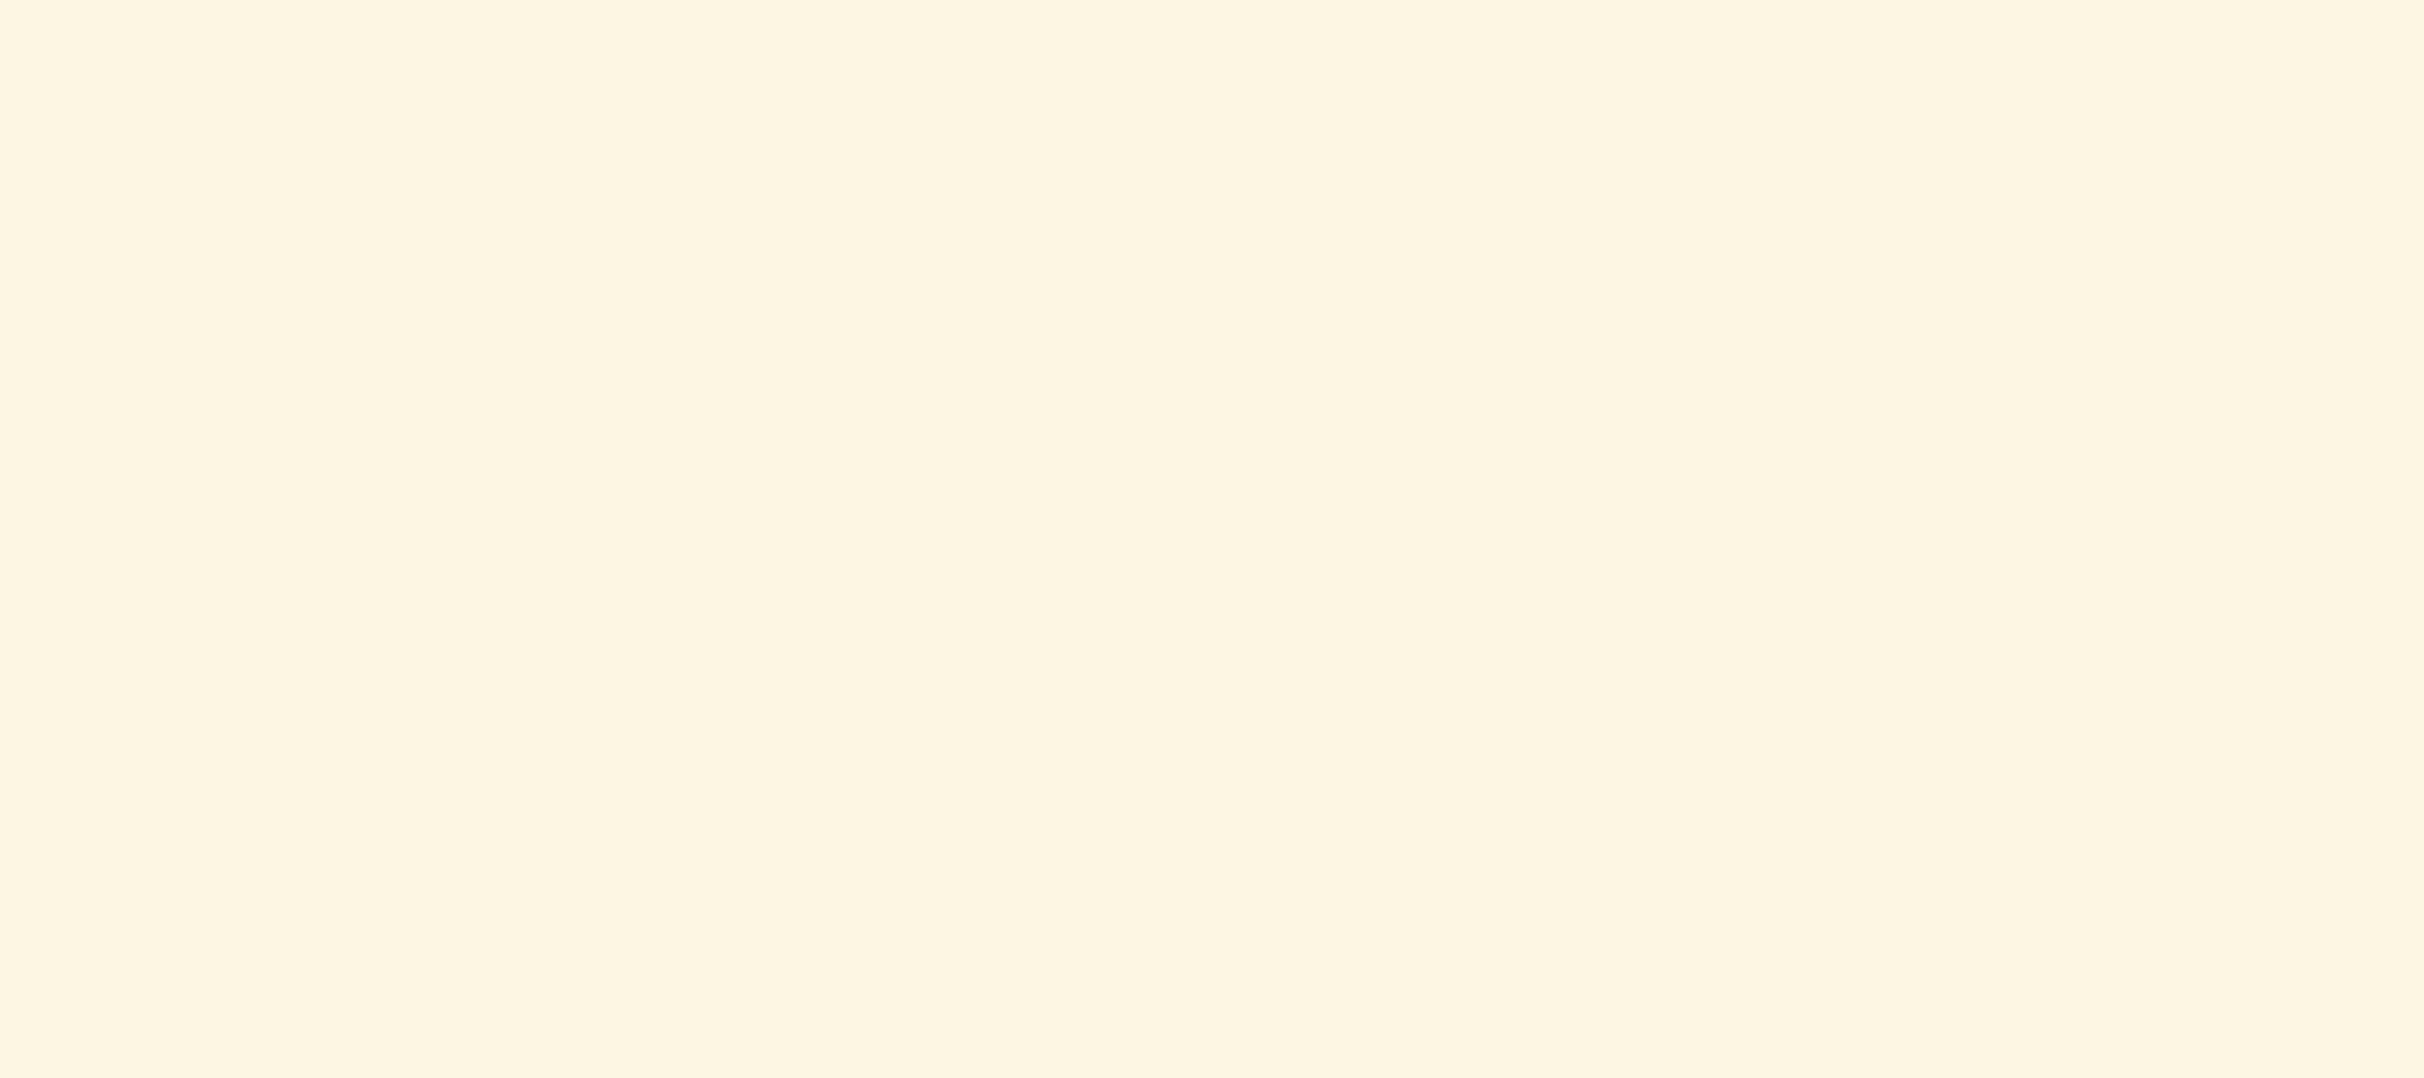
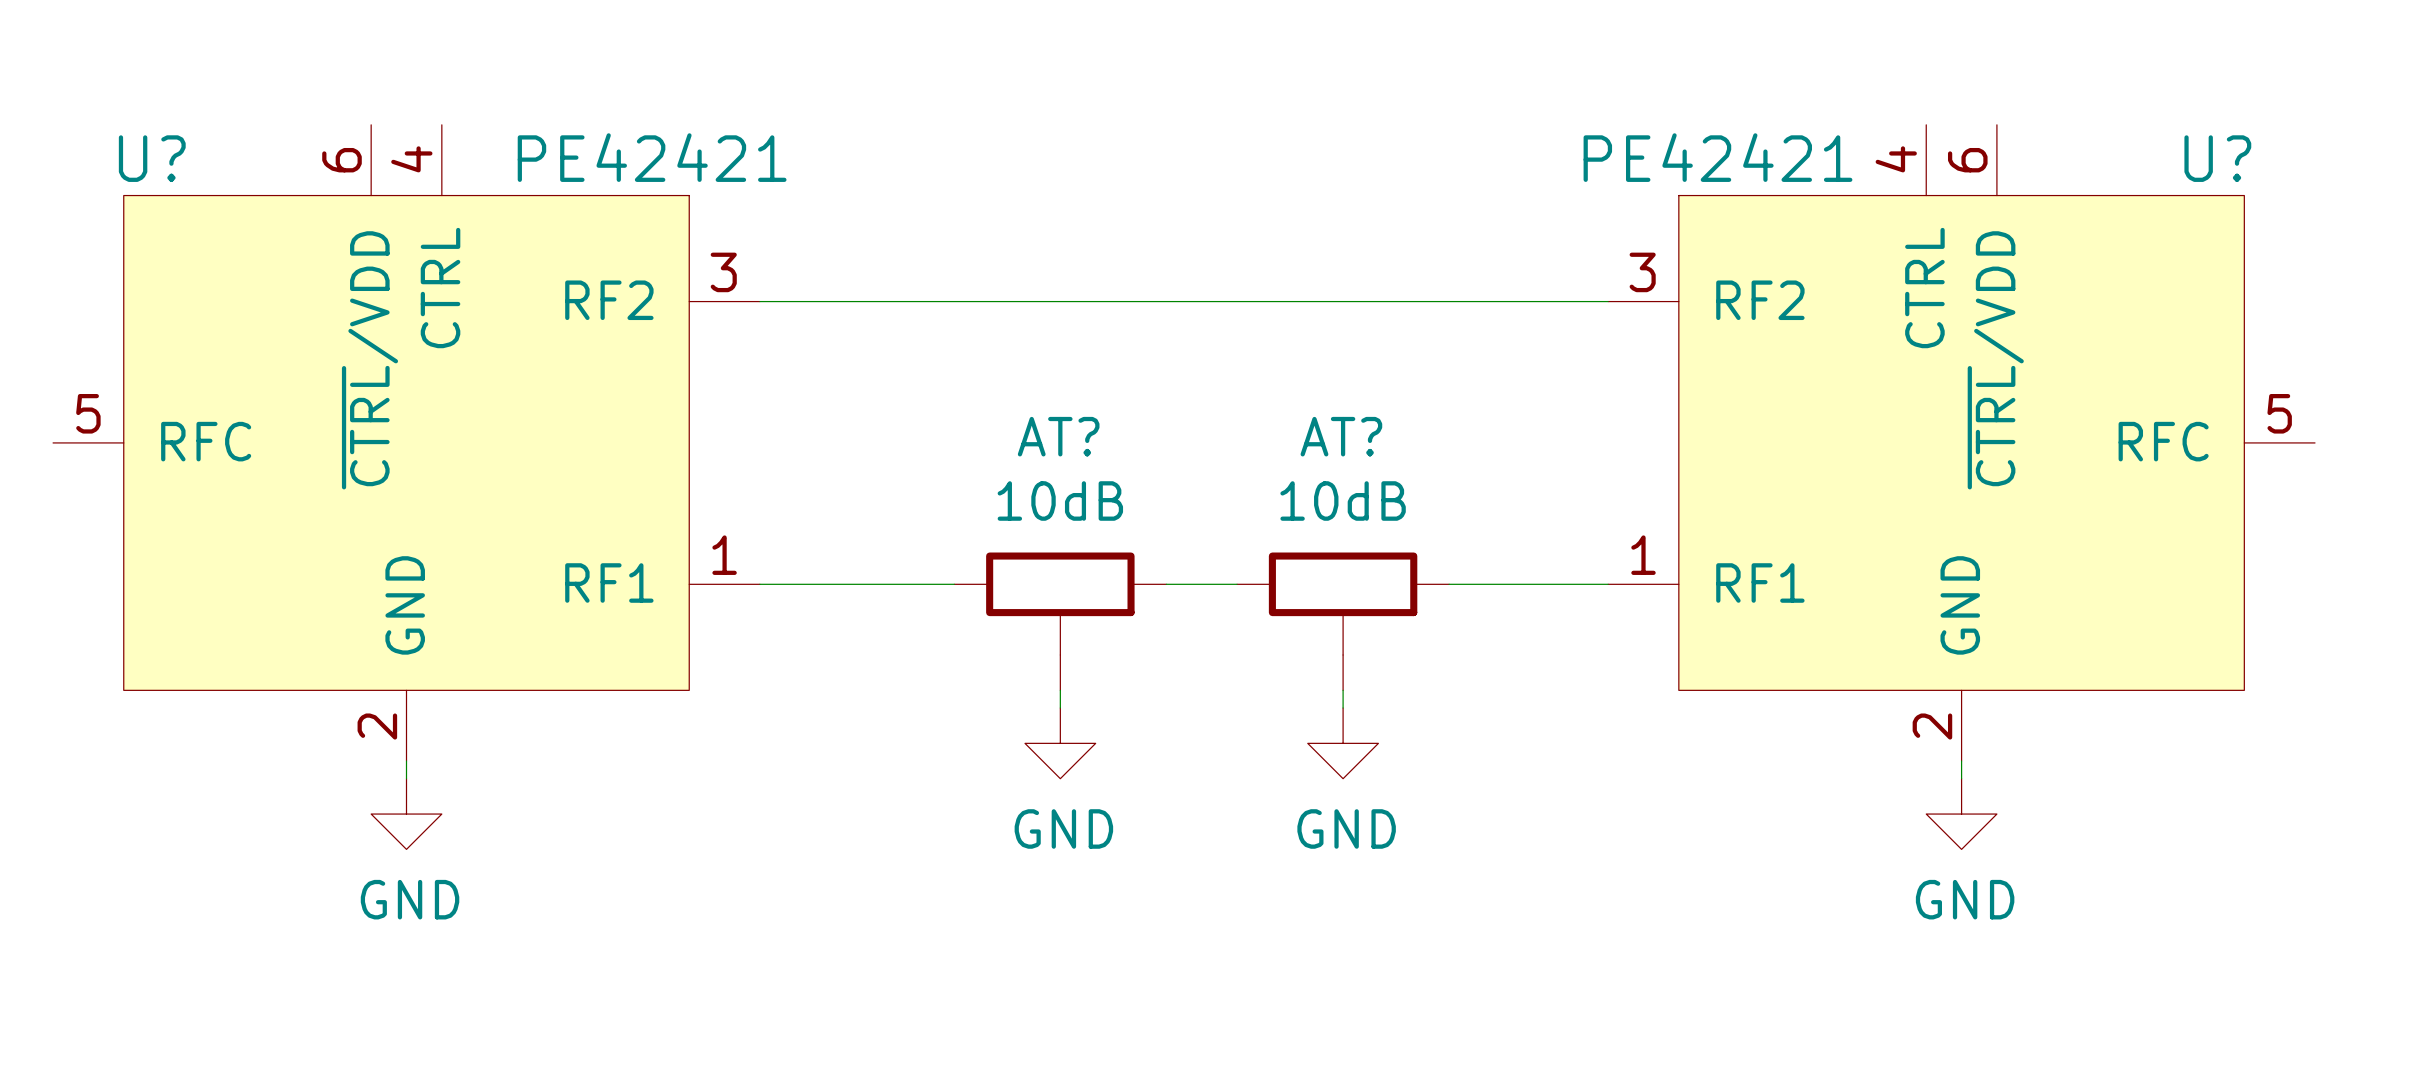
wire: none -> (759, 301) (1608, 301)
U?: none -> PE42421 (406, 442)
U?: none -> PE42421 (1961, 442)
wire: none -> (759, 584) (954, 584)
wire: none -> (1166, 584) (1237, 584)
wire: none -> (1449, 584) (1608, 584)
AT?: none -> 10dB (1060, 621)
AT?: none -> 10dB (1343, 621)
wire: none -> (1060, 690) (1060, 708)
wire: none -> (1343, 690) (1343, 708)
power symbol: none -> GND (1060, 743)
power symbol: none -> GND (1343, 743)
wire: none -> (406, 761) (406, 778)
wire: none -> (1961, 761) (1961, 778)
power symbol: none -> GND (406, 814)
power symbol: none -> GND (1961, 814)

